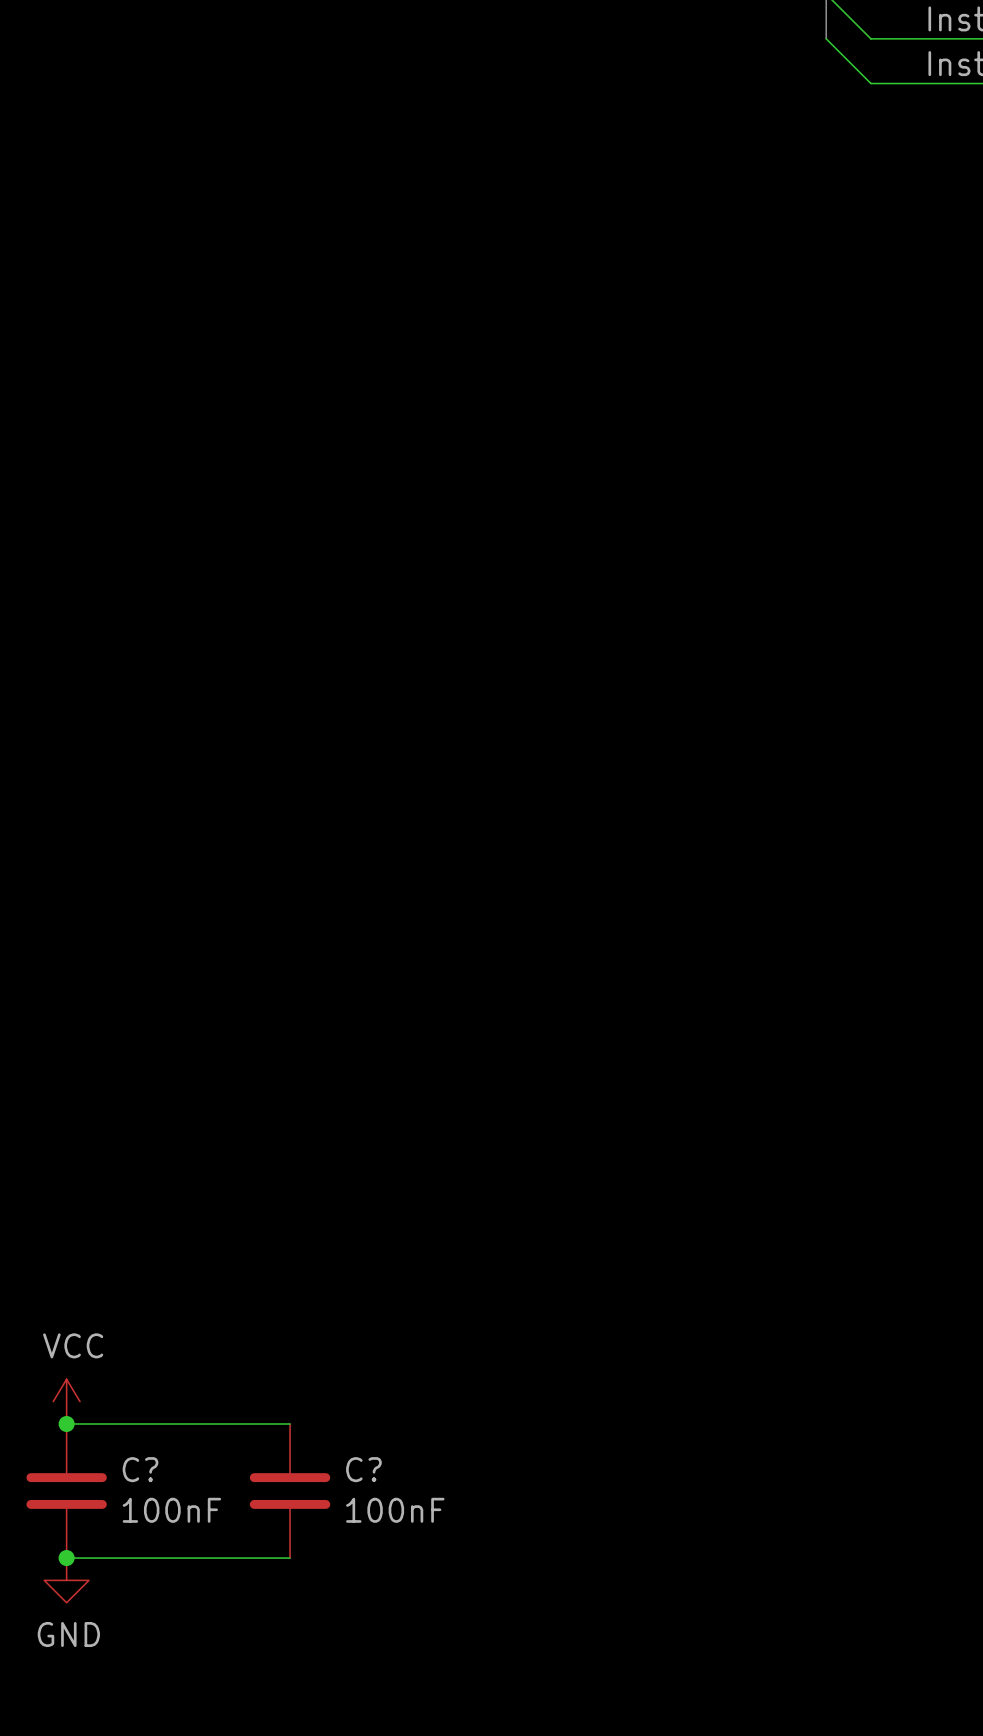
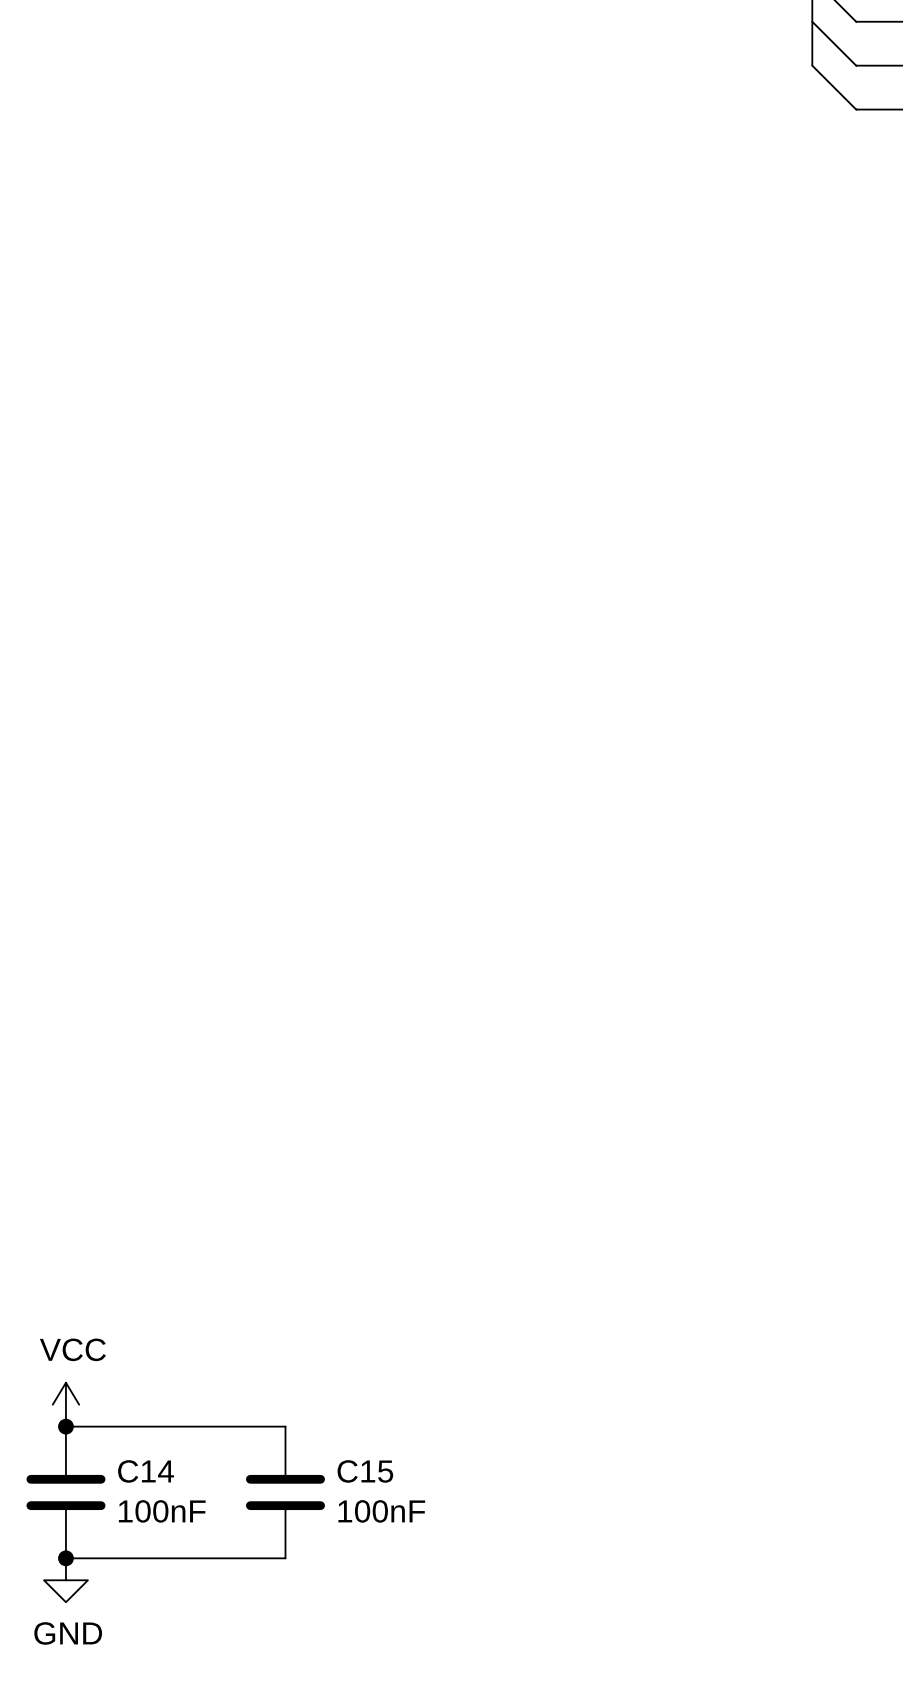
C? name: C? (140, 1469) -> C14 (146, 1471)
C? name: C? (363, 1469) -> C15 (365, 1471)

